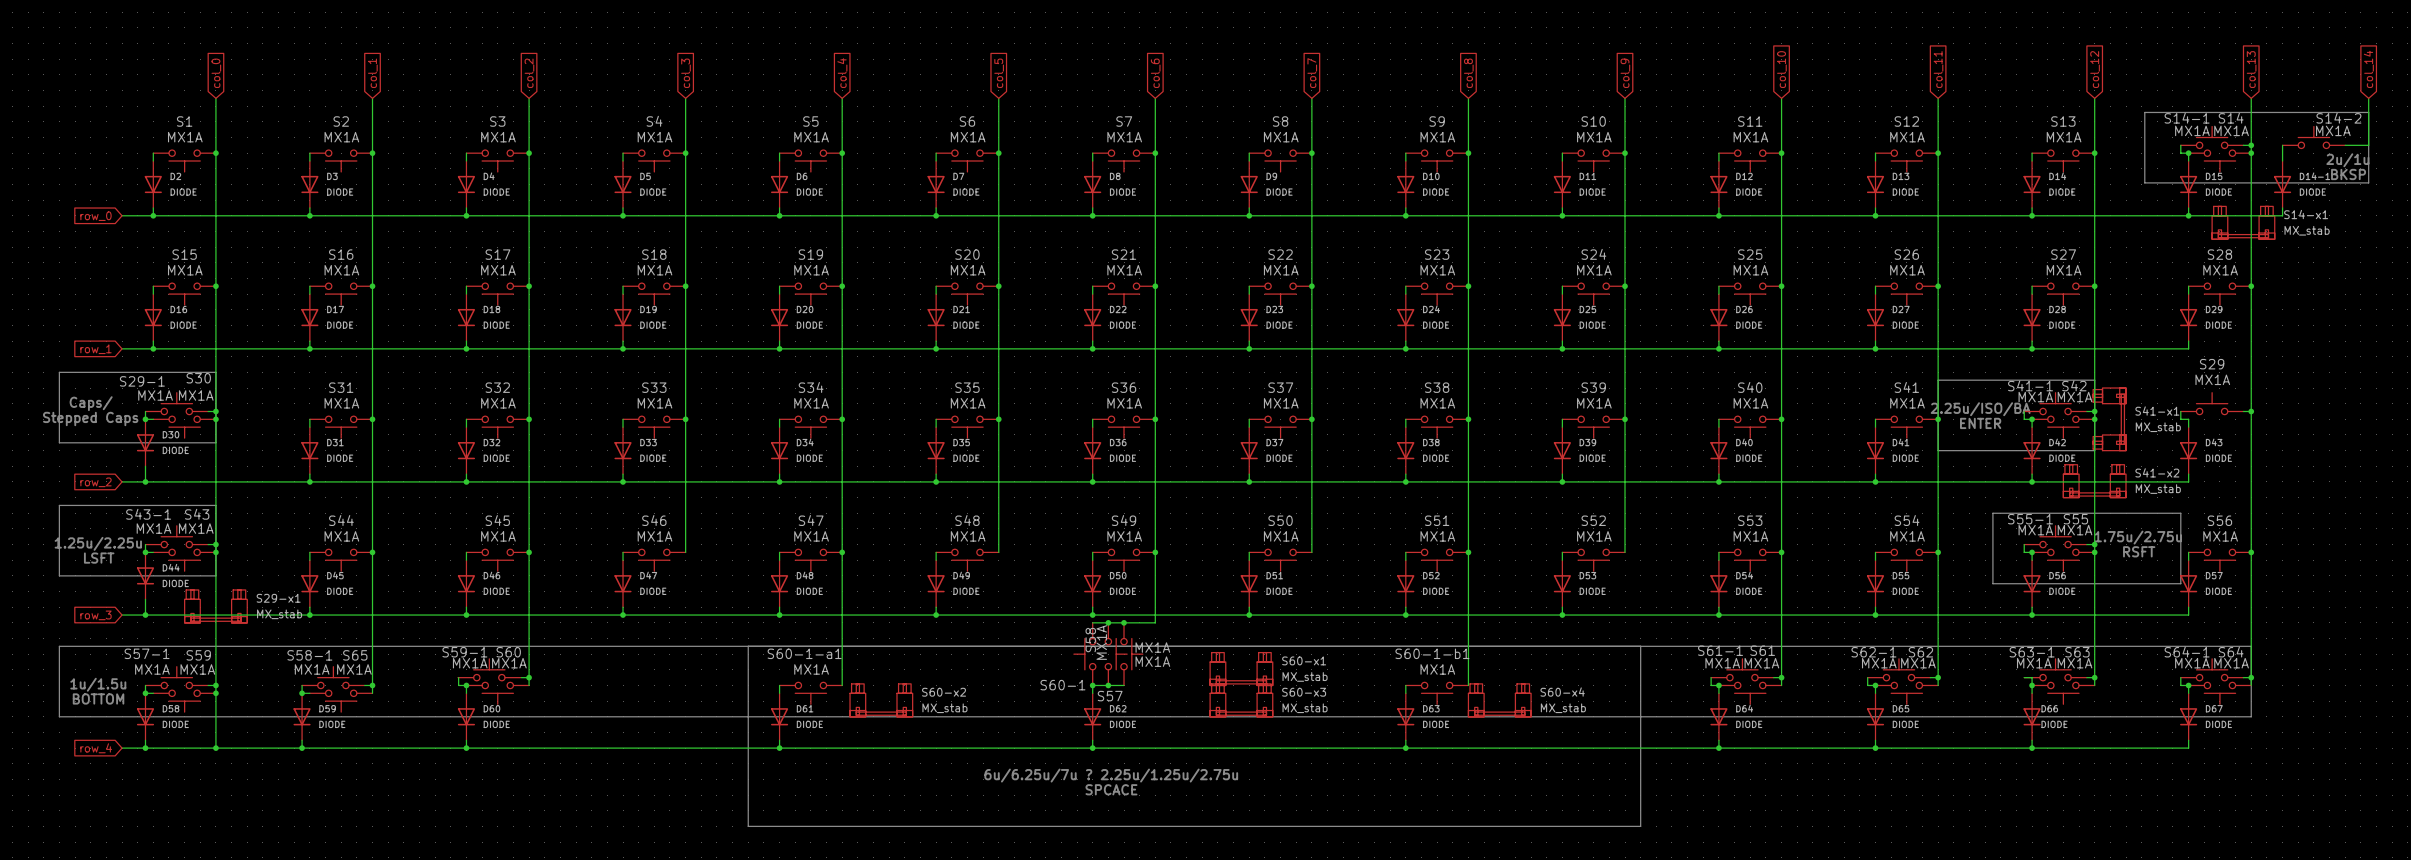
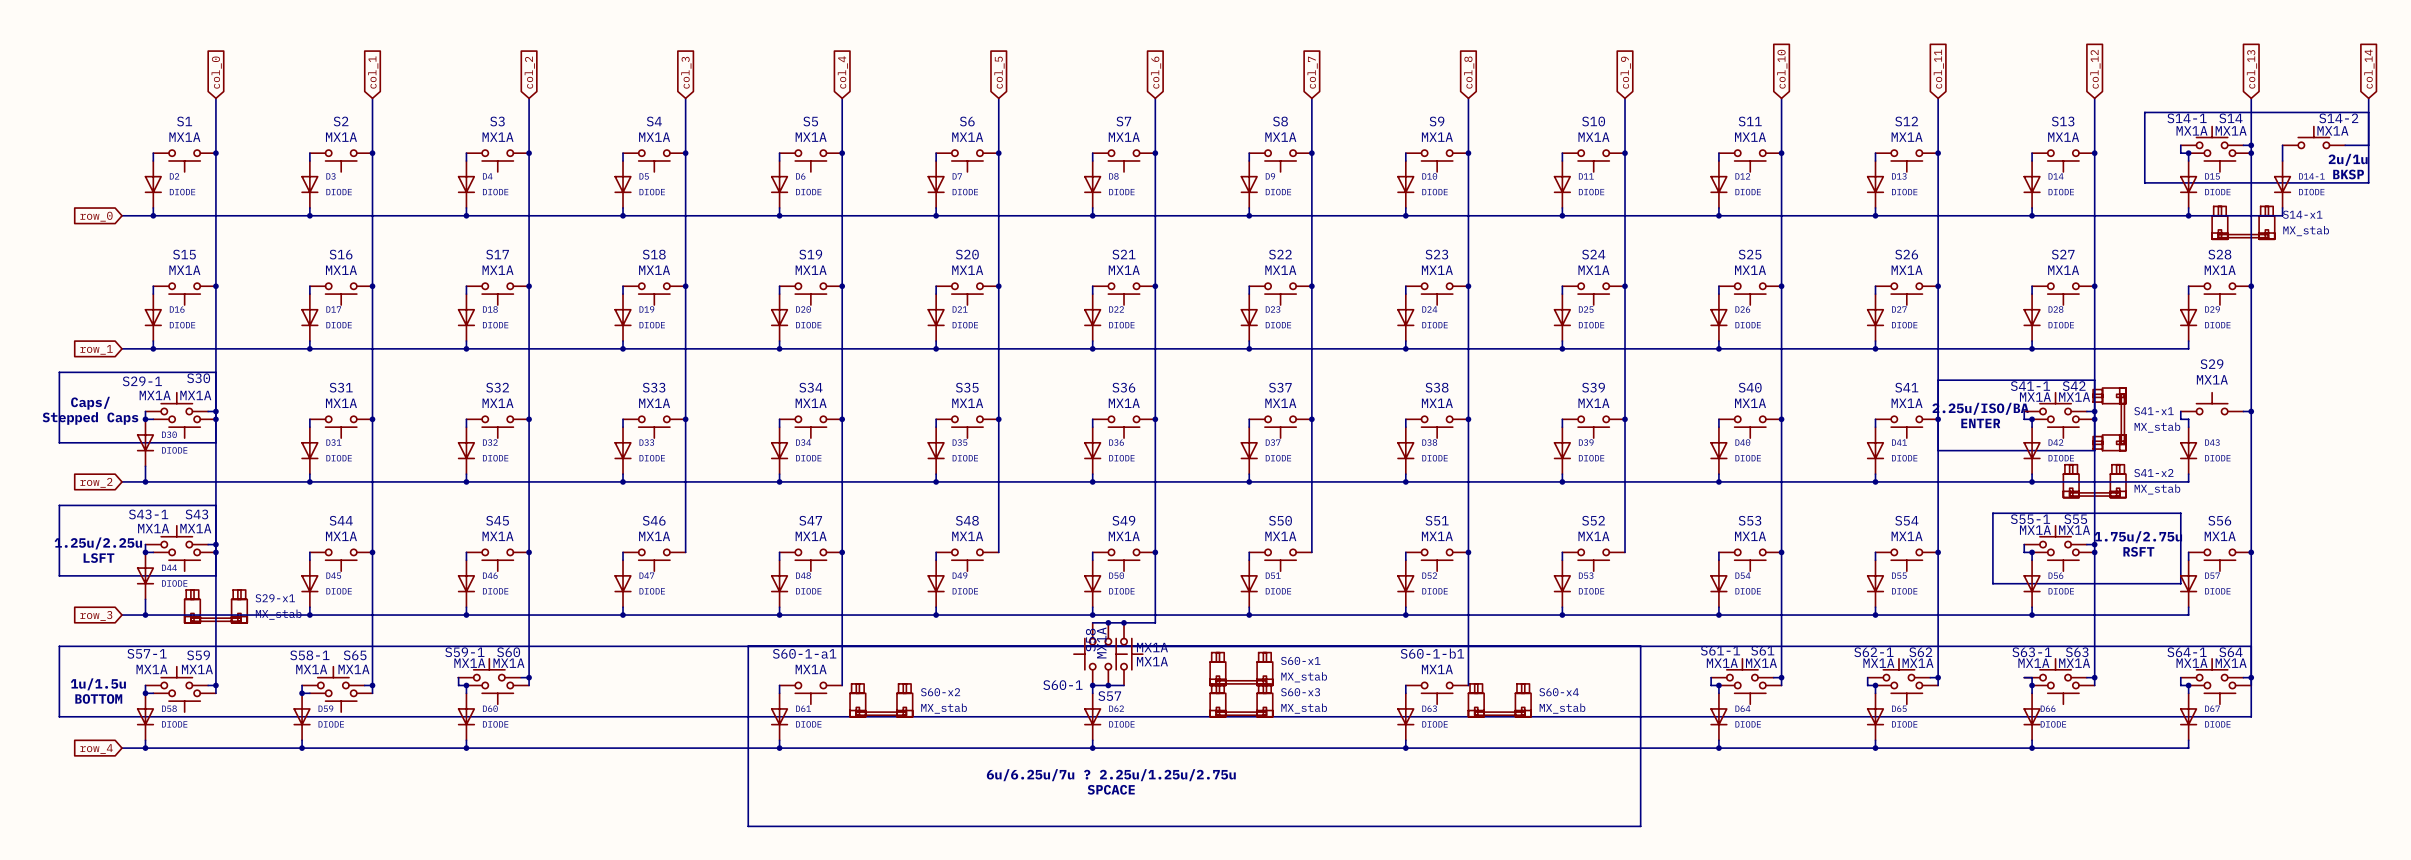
wire: (215, 693) (215, 748) -> none
junction: (215, 693) -> none
junction: (215, 748) -> none

